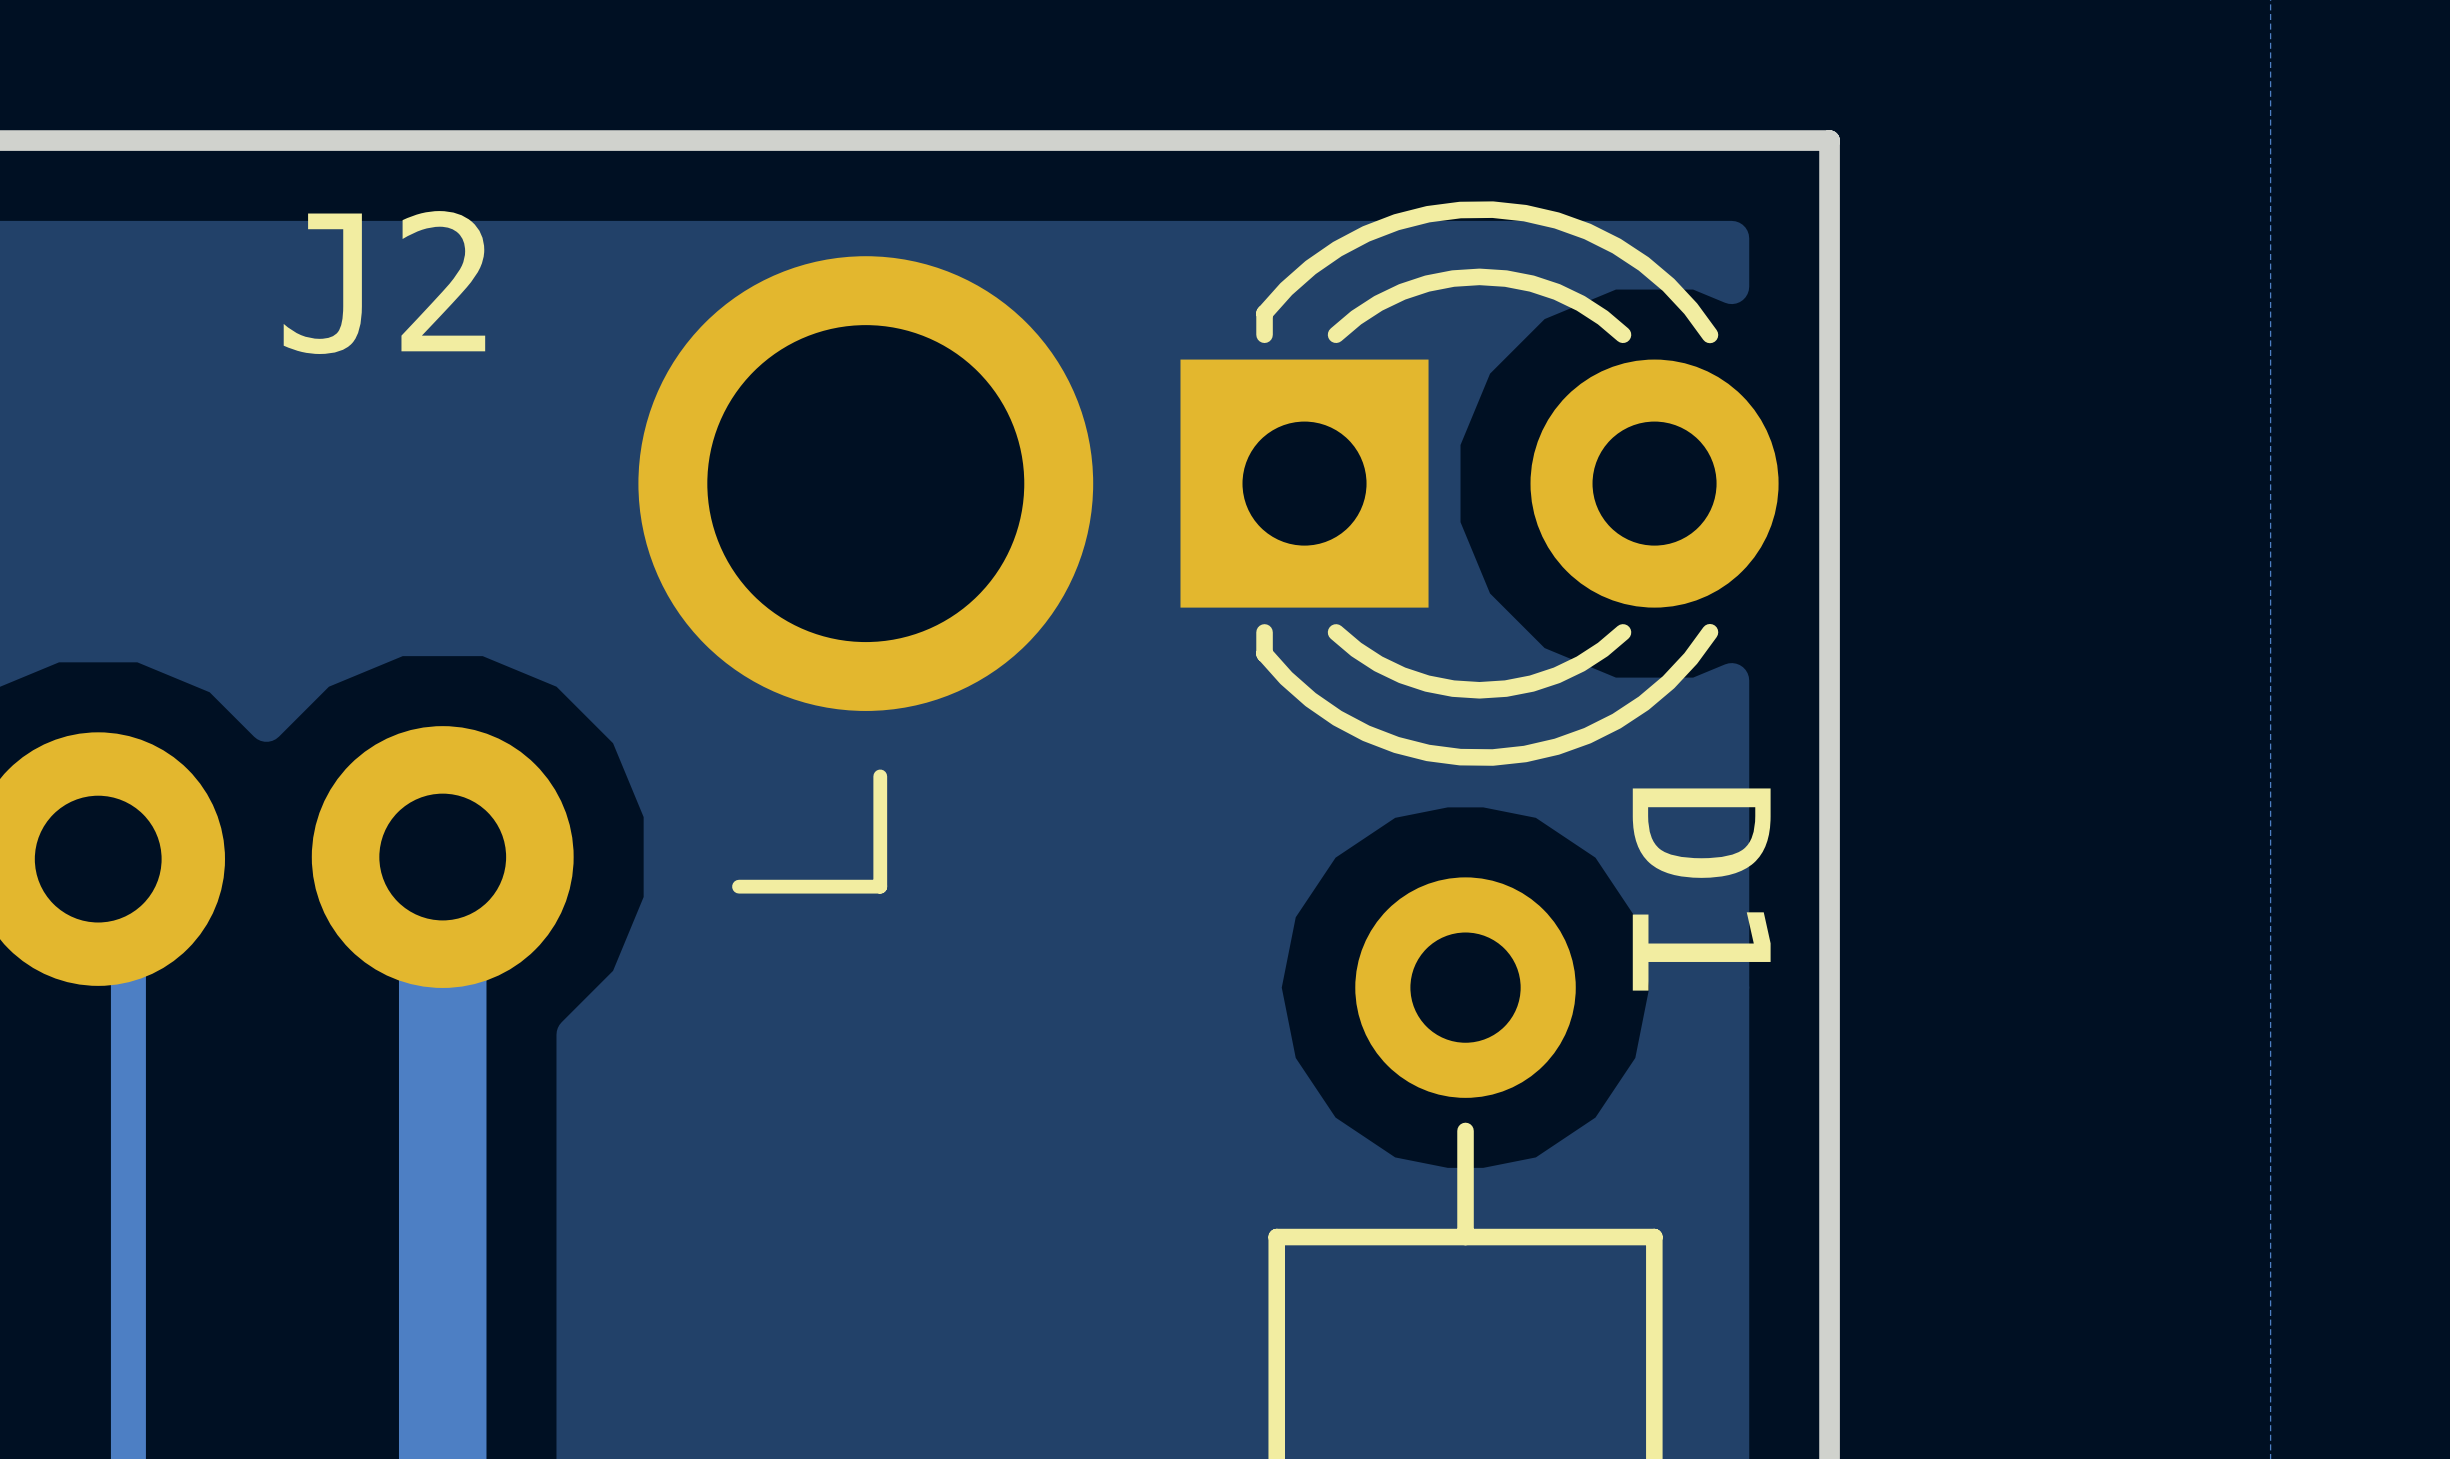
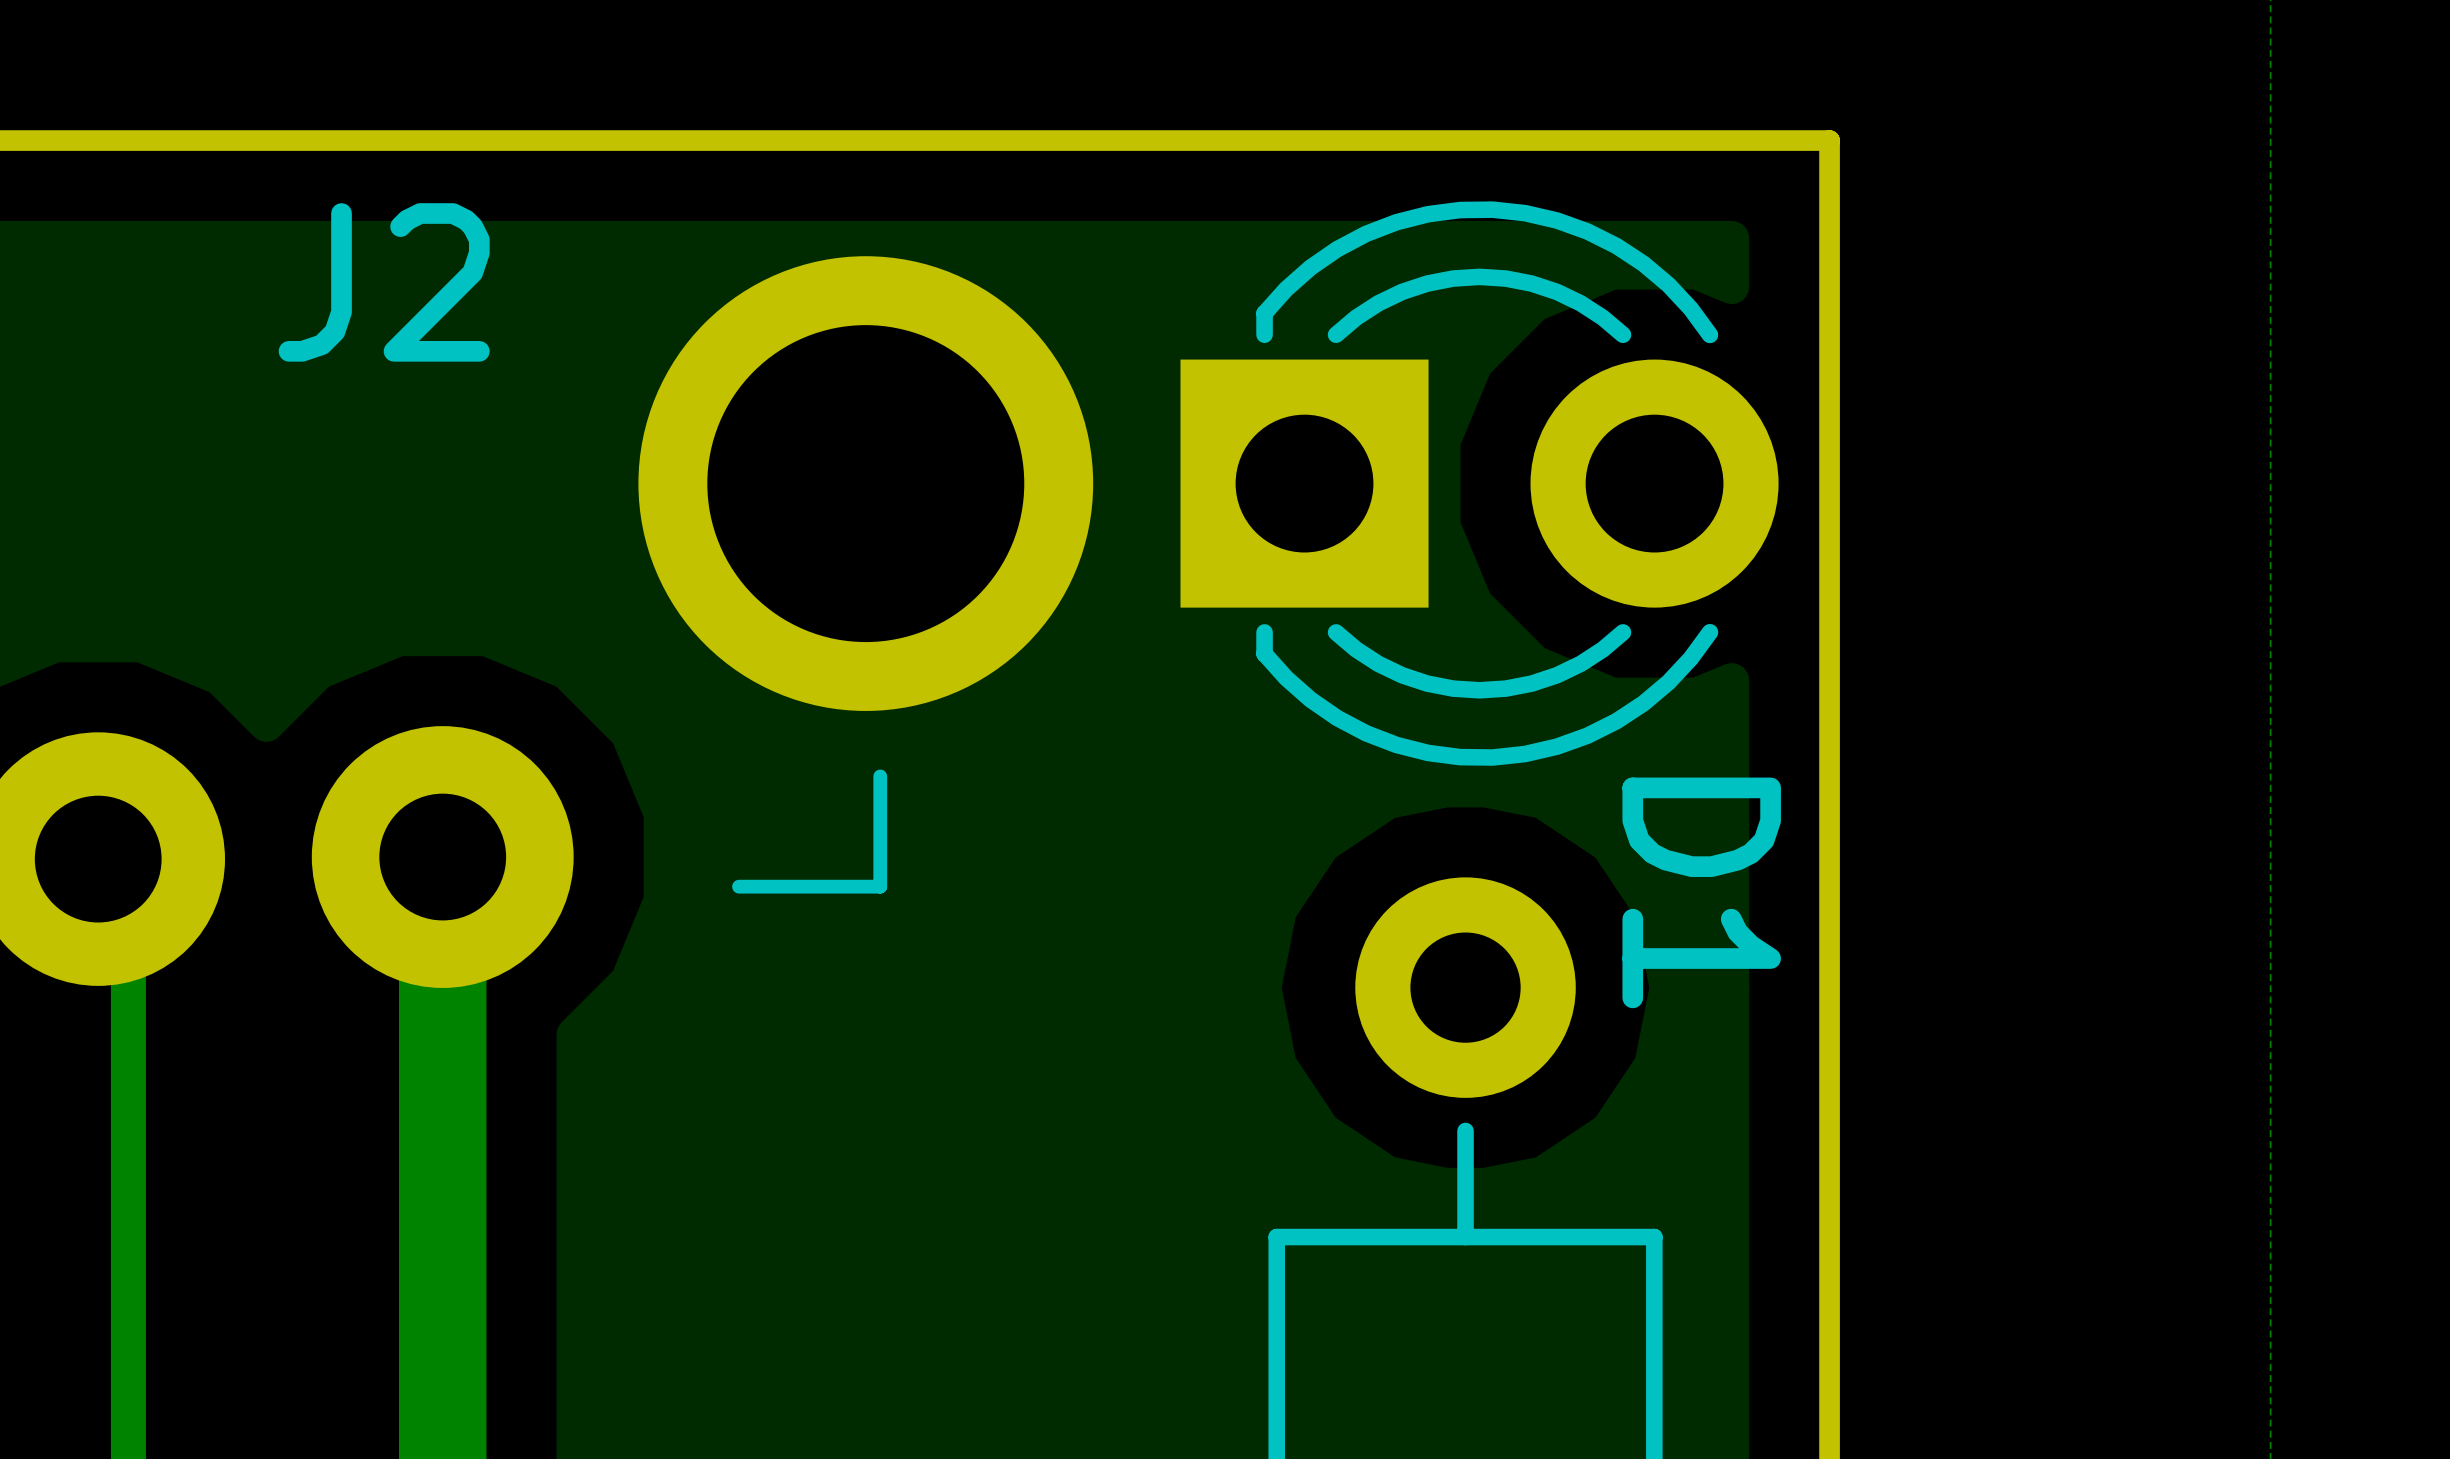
D1 footprint: [1180, 201, 1779, 766] -> [1180, 201, 1779, 766]

